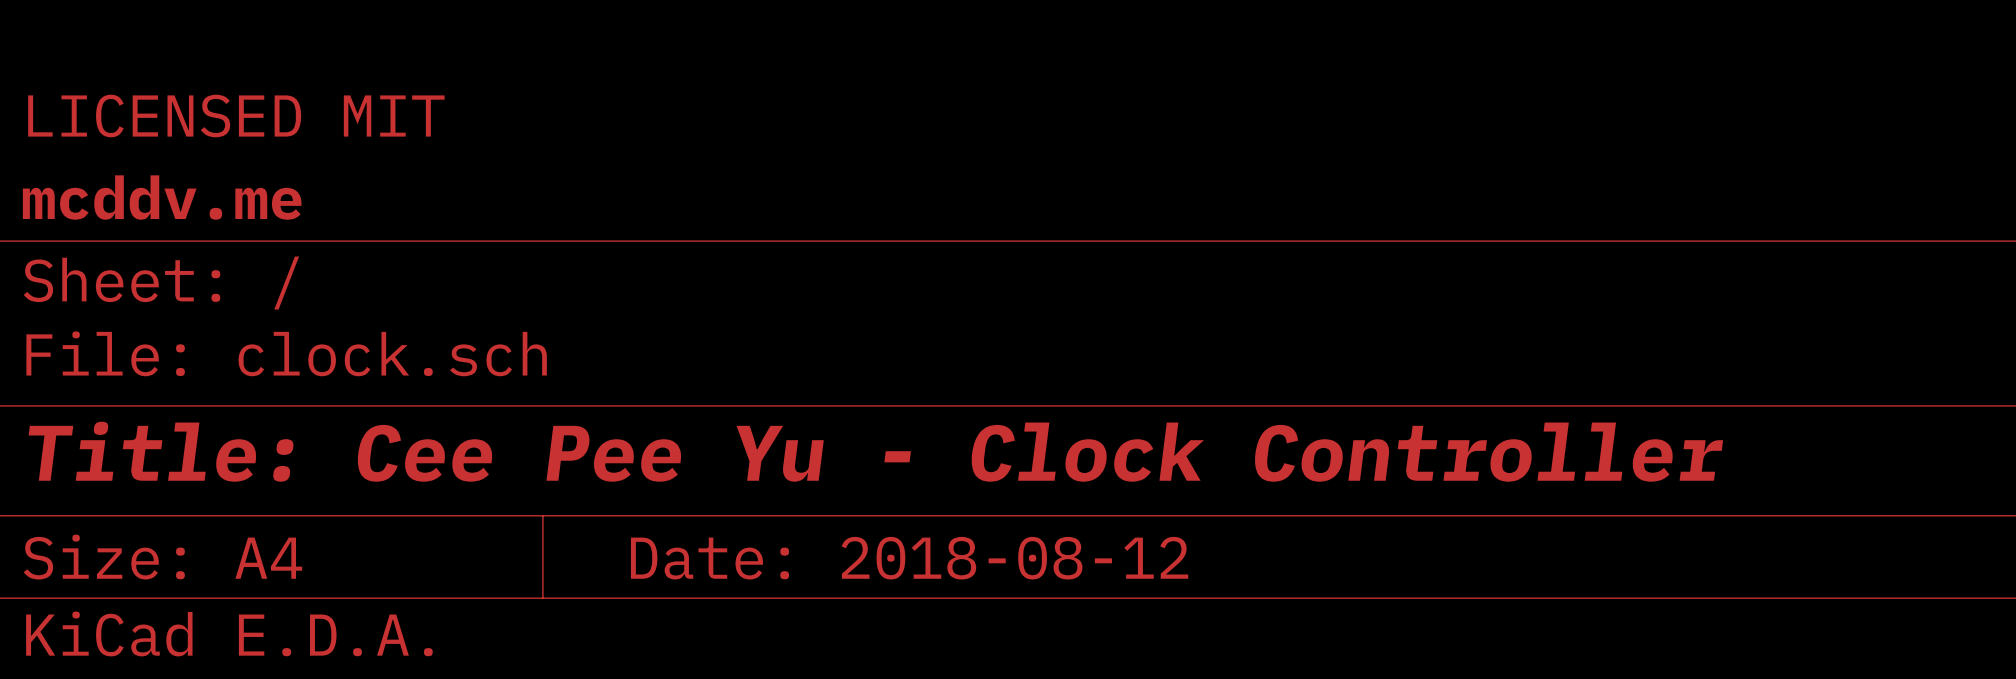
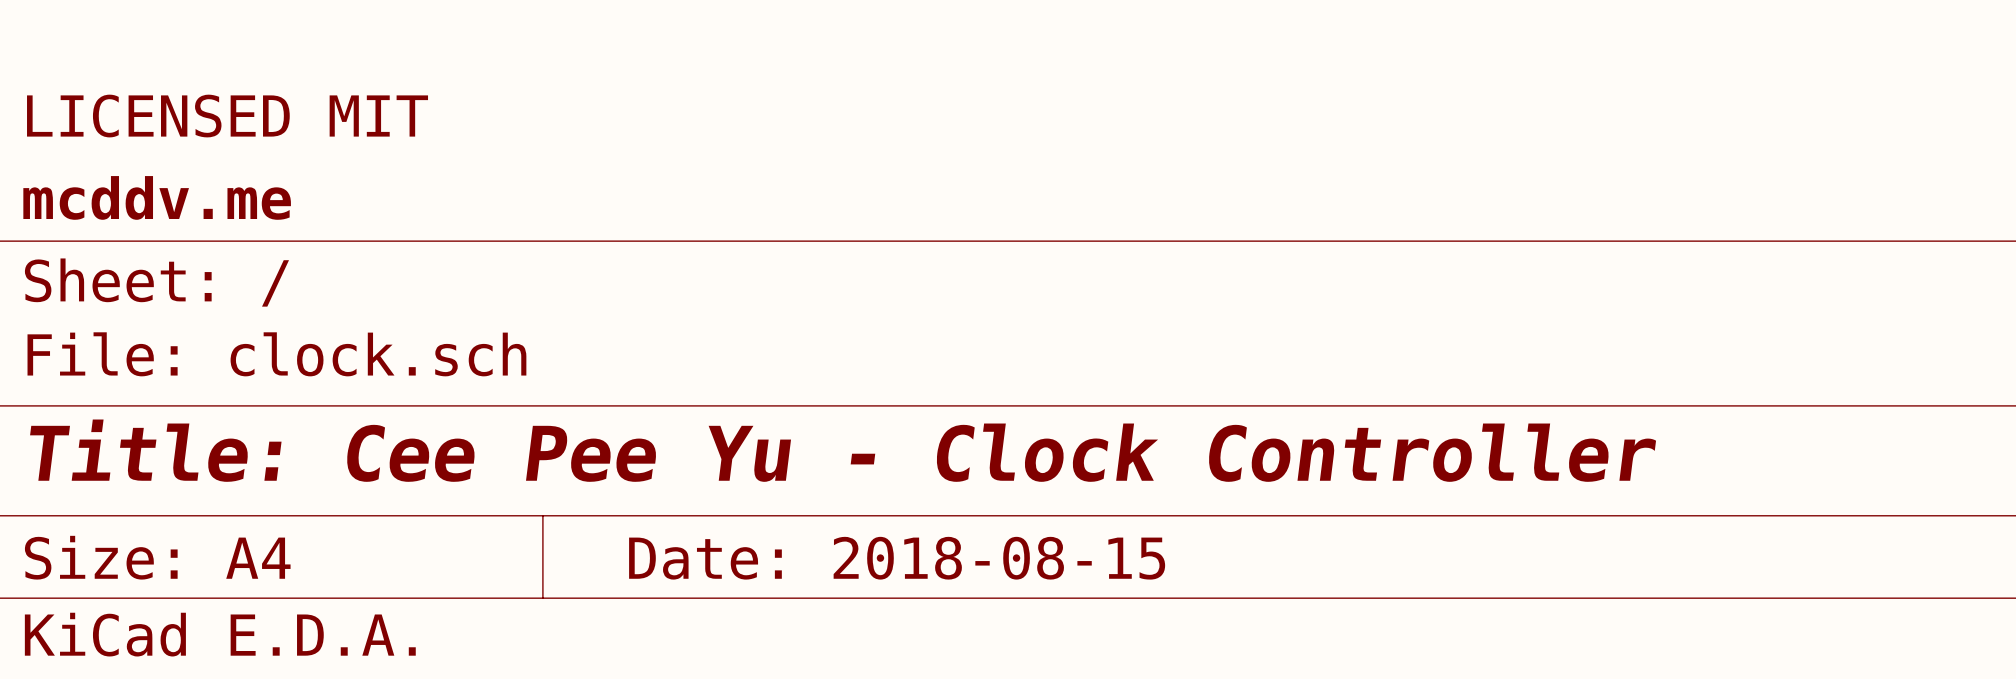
title block: Date: 2018-08-12 (909, 558) -> Date: 2018-08-15 (897, 558)

